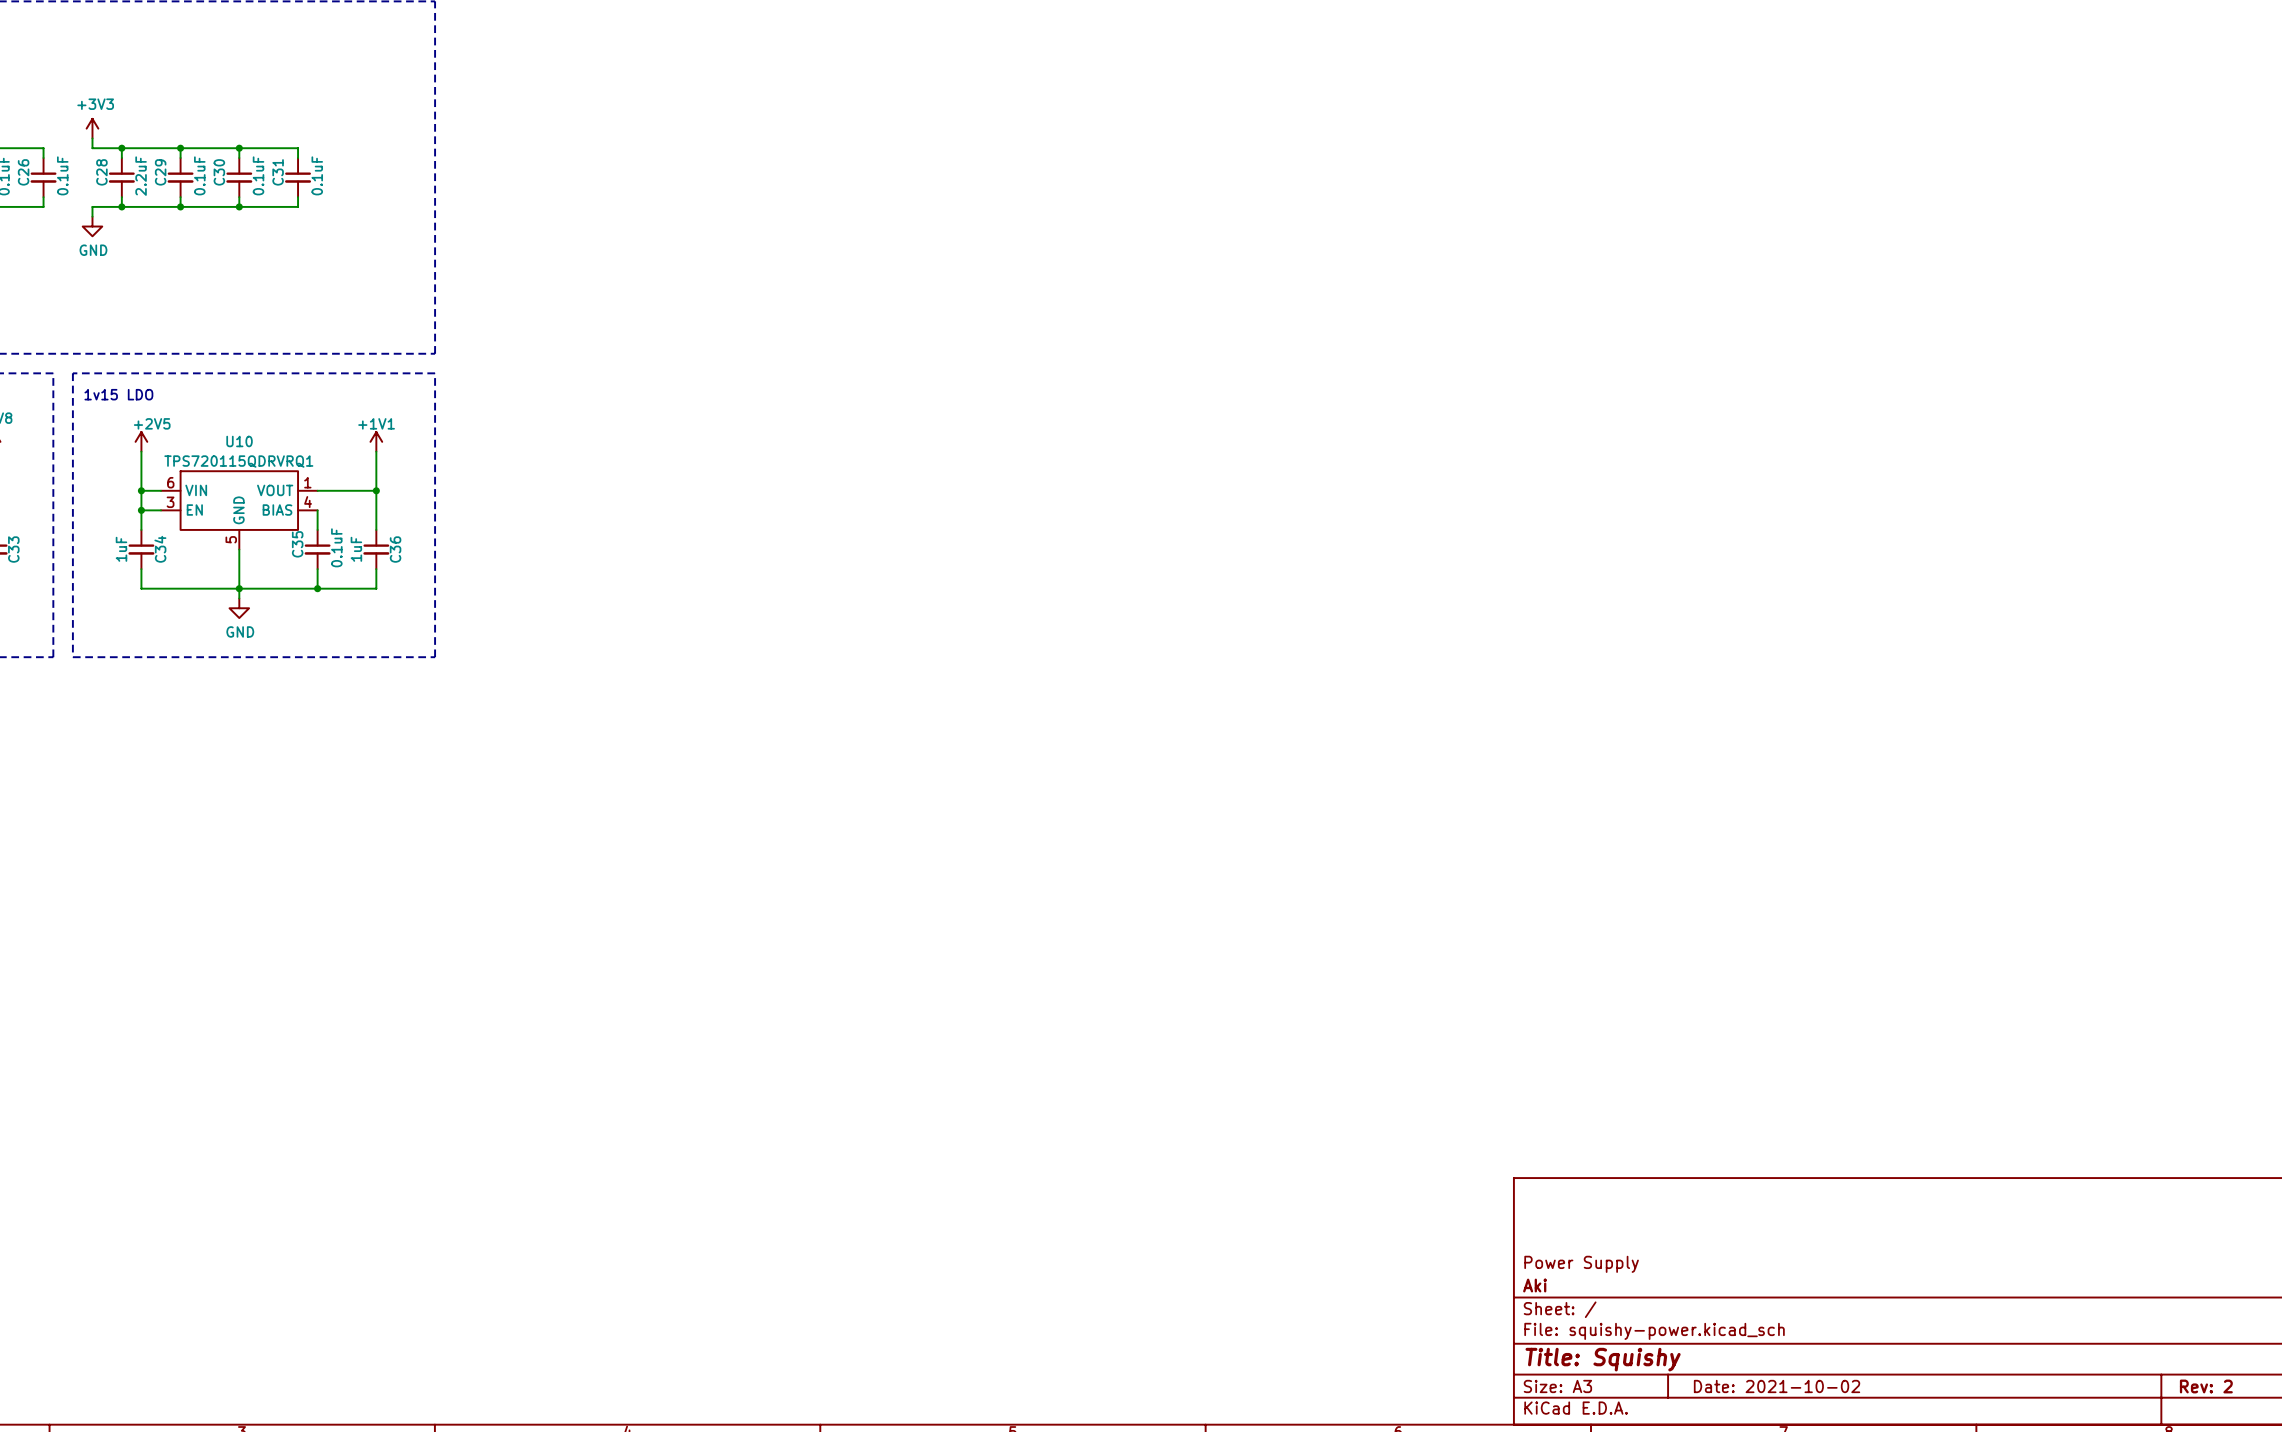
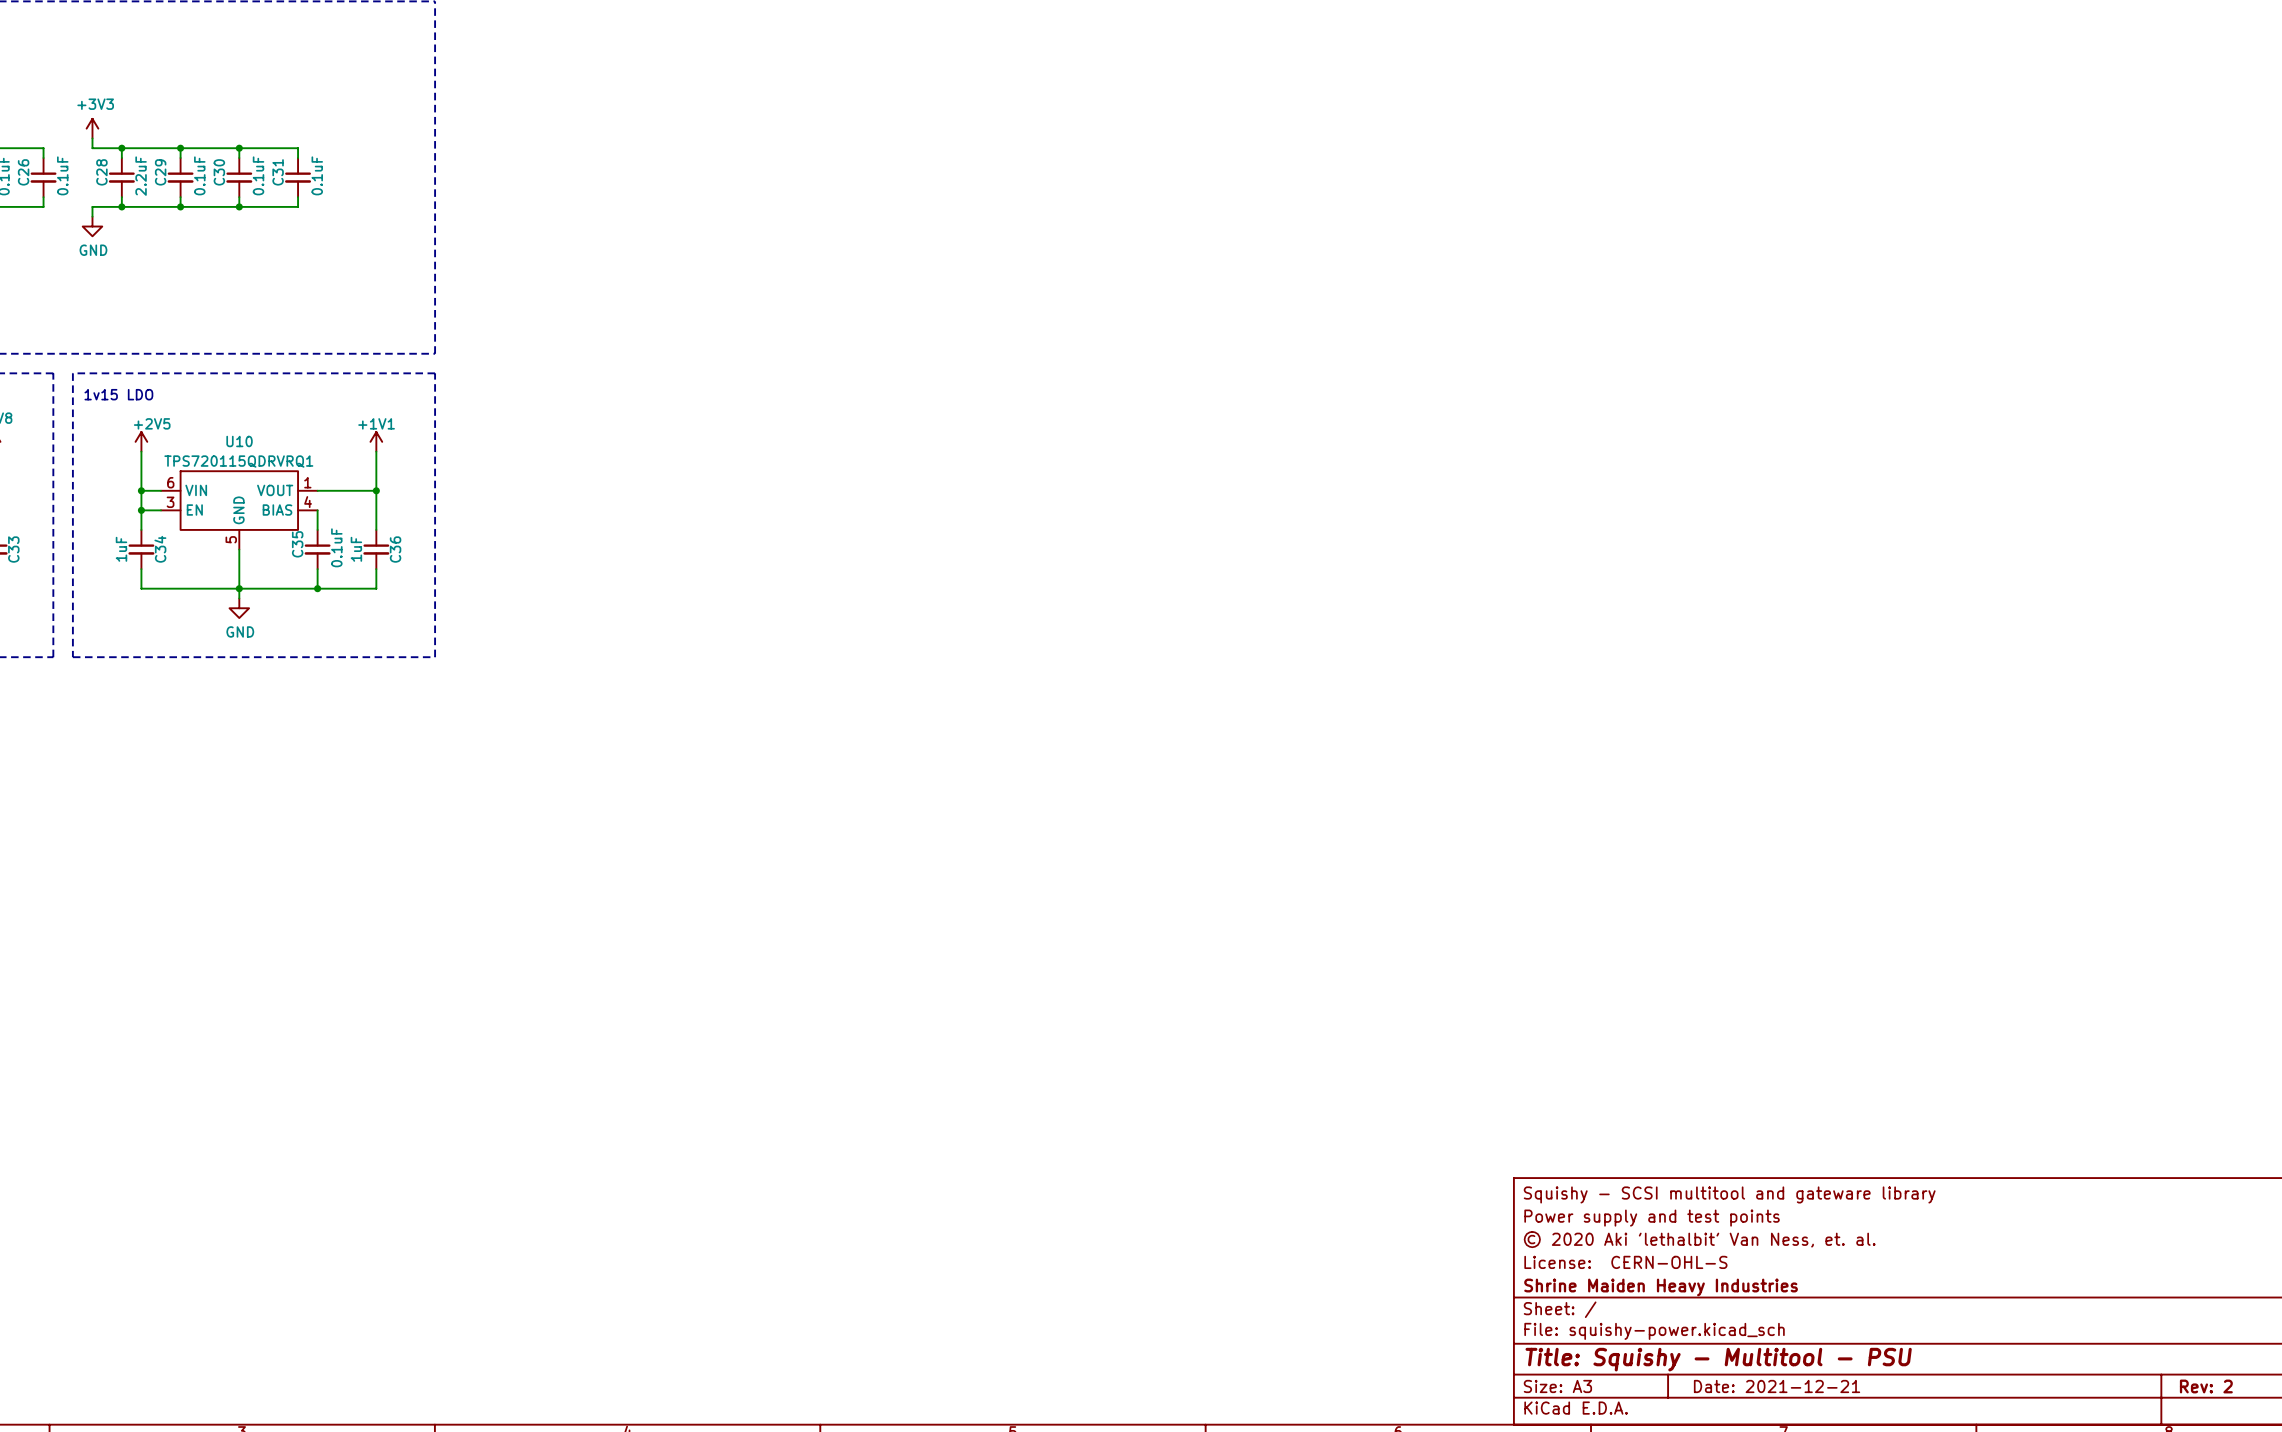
title block: none -> Squishy - SCSI multitool and gateware library (1729, 1194)
title block: none -> Power supply and test points (1652, 1218)
title block: none -> © 2020 Aki 'lethalbit' Van Ness, et. al. (1699, 1239)
title block: Power Supply (1581, 1264) -> License: CERN-OHL-S (1625, 1262)
title block: Aki (1535, 1285) -> Shrine Maiden Heavy Industries (1661, 1287)
title block: Title: Squishy (1603, 1359) -> Title: Squishy - Multitool - PSU (1718, 1359)
title block: Date: 2021-10-02 (1777, 1386) -> Date: 2021-12-21 (1777, 1386)

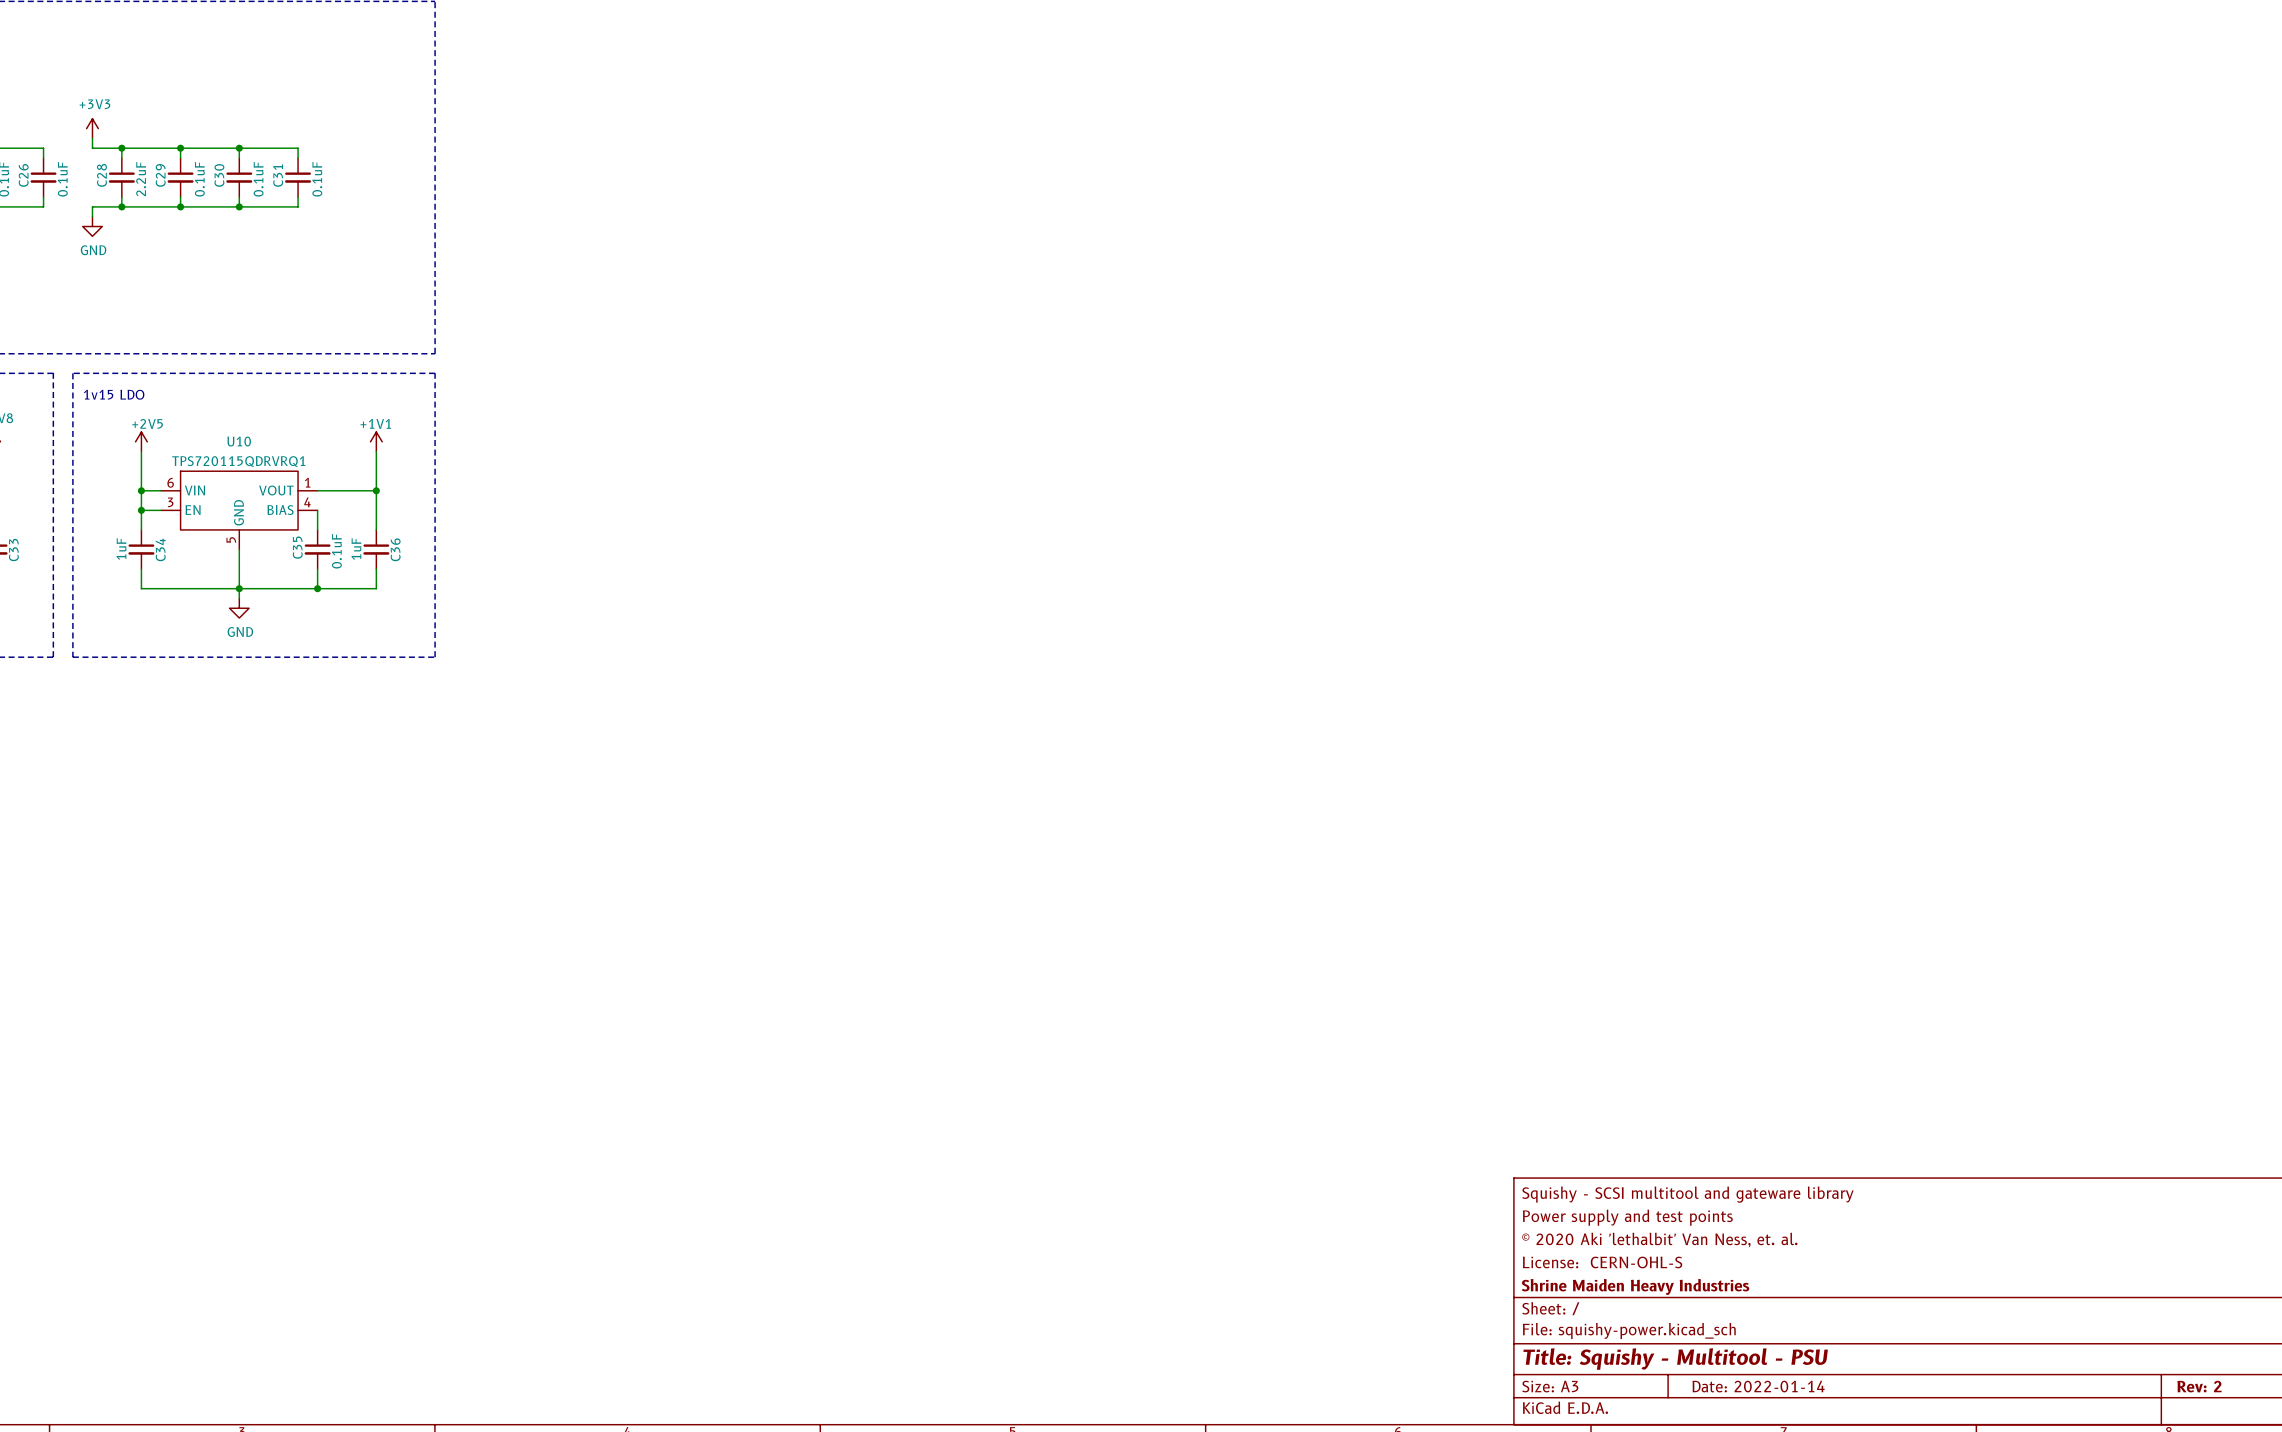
title block: Date: 2021-12-21 (1777, 1386) -> Date: 2022-01-14 (1758, 1386)

